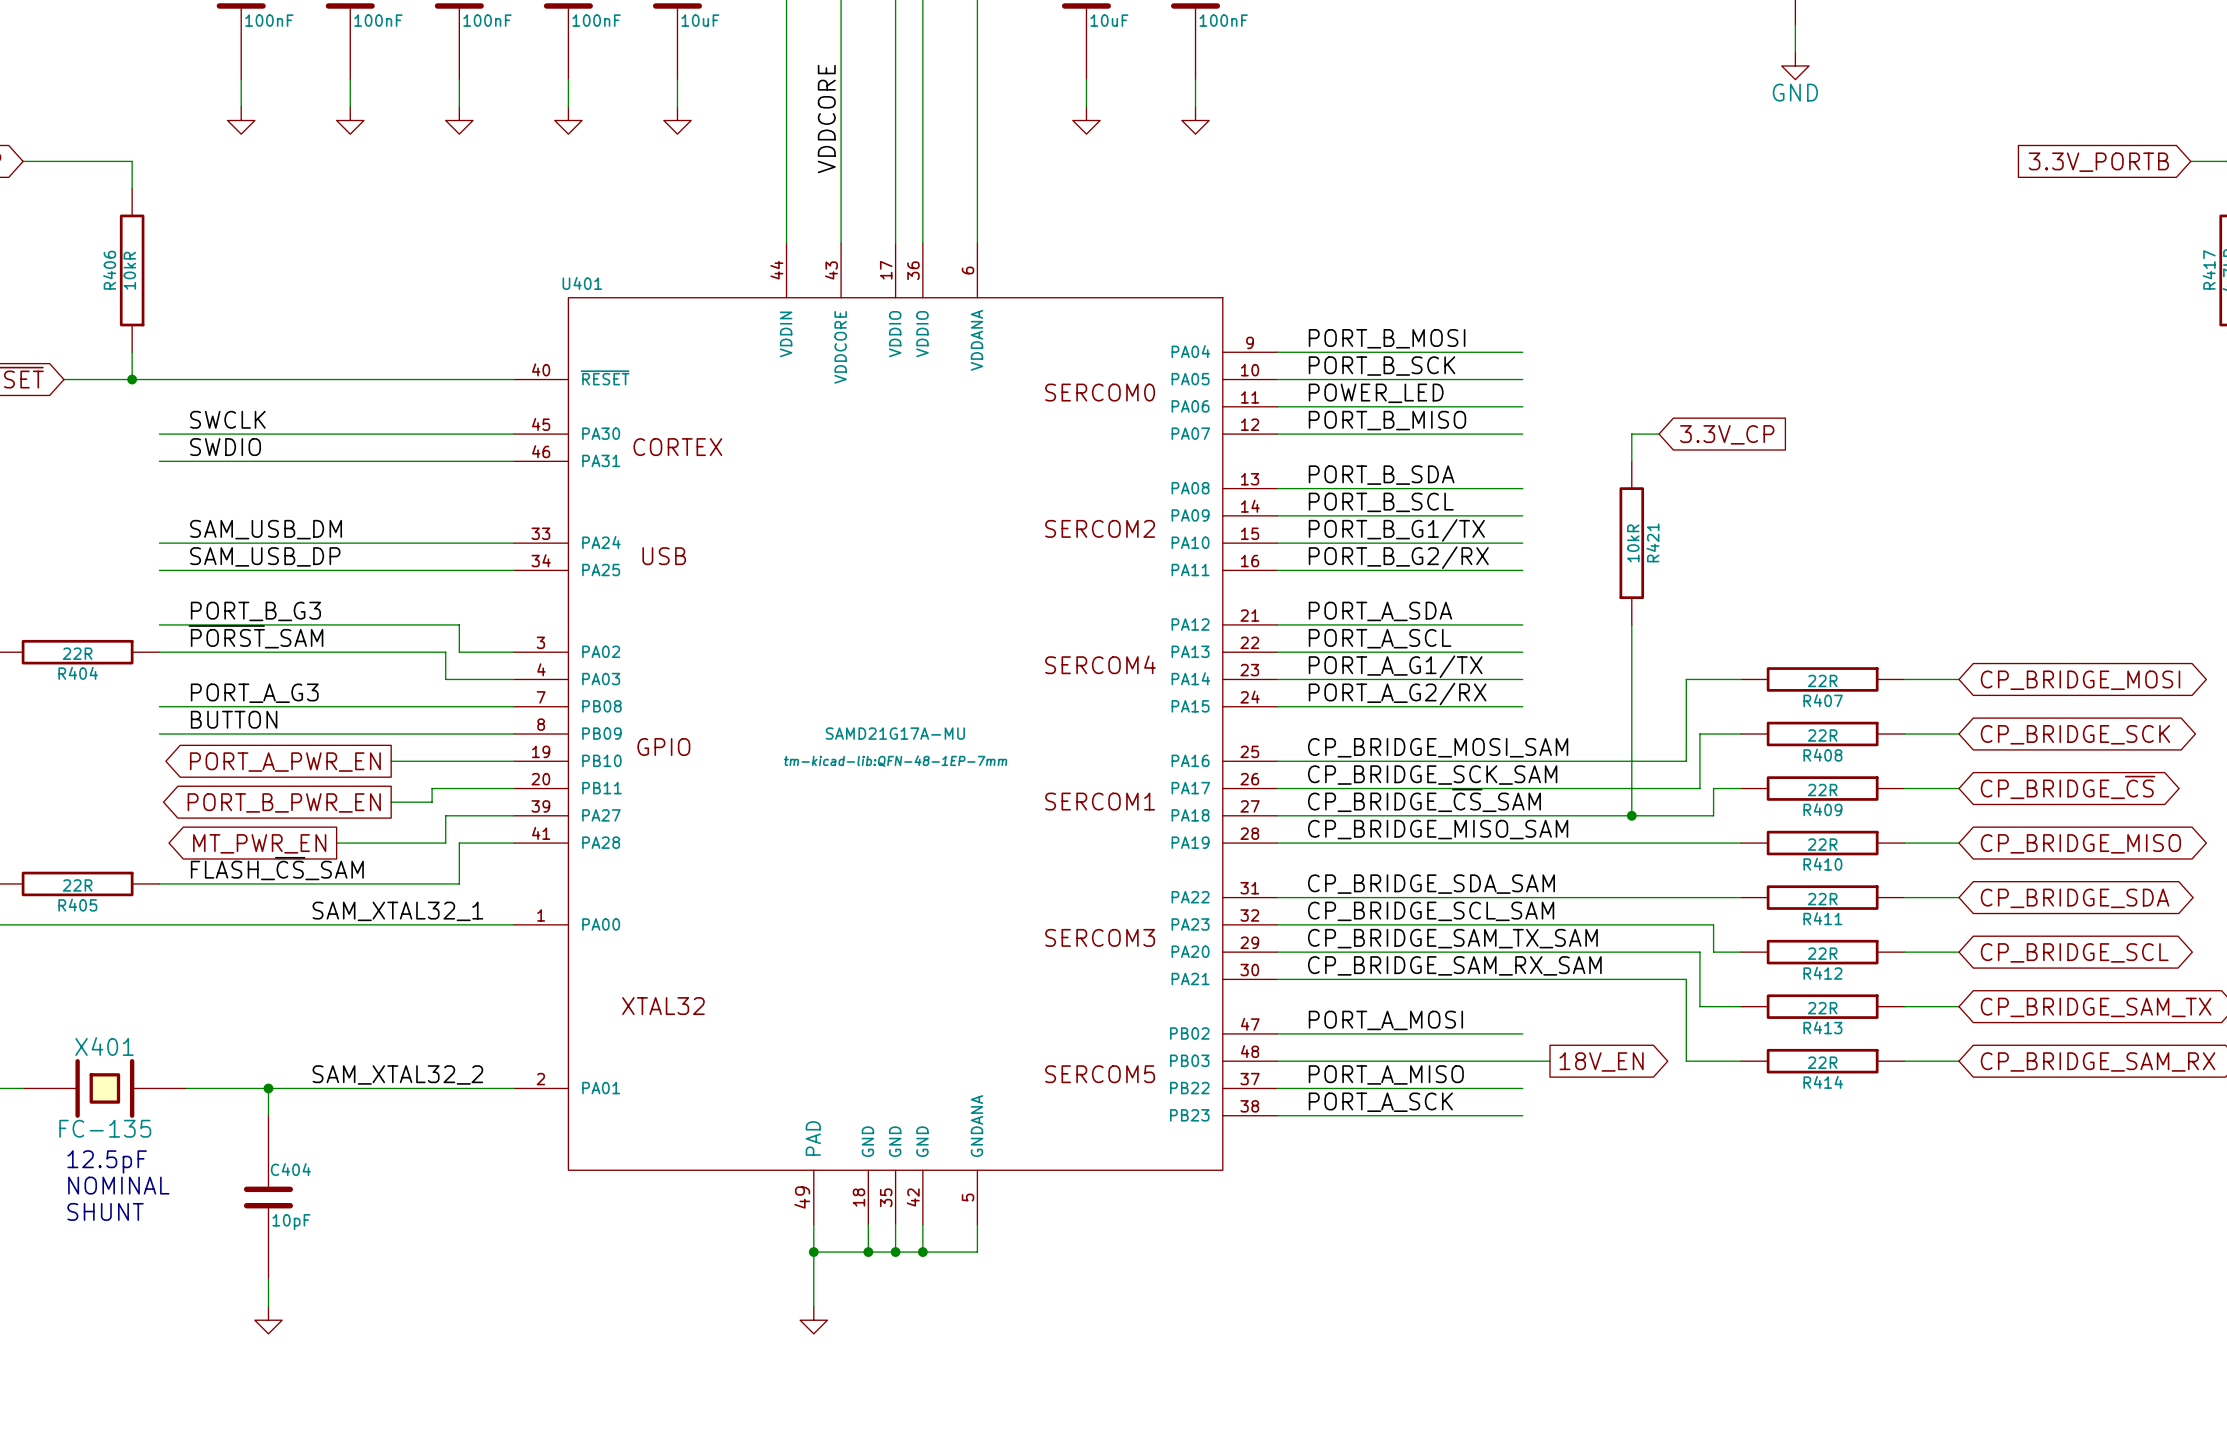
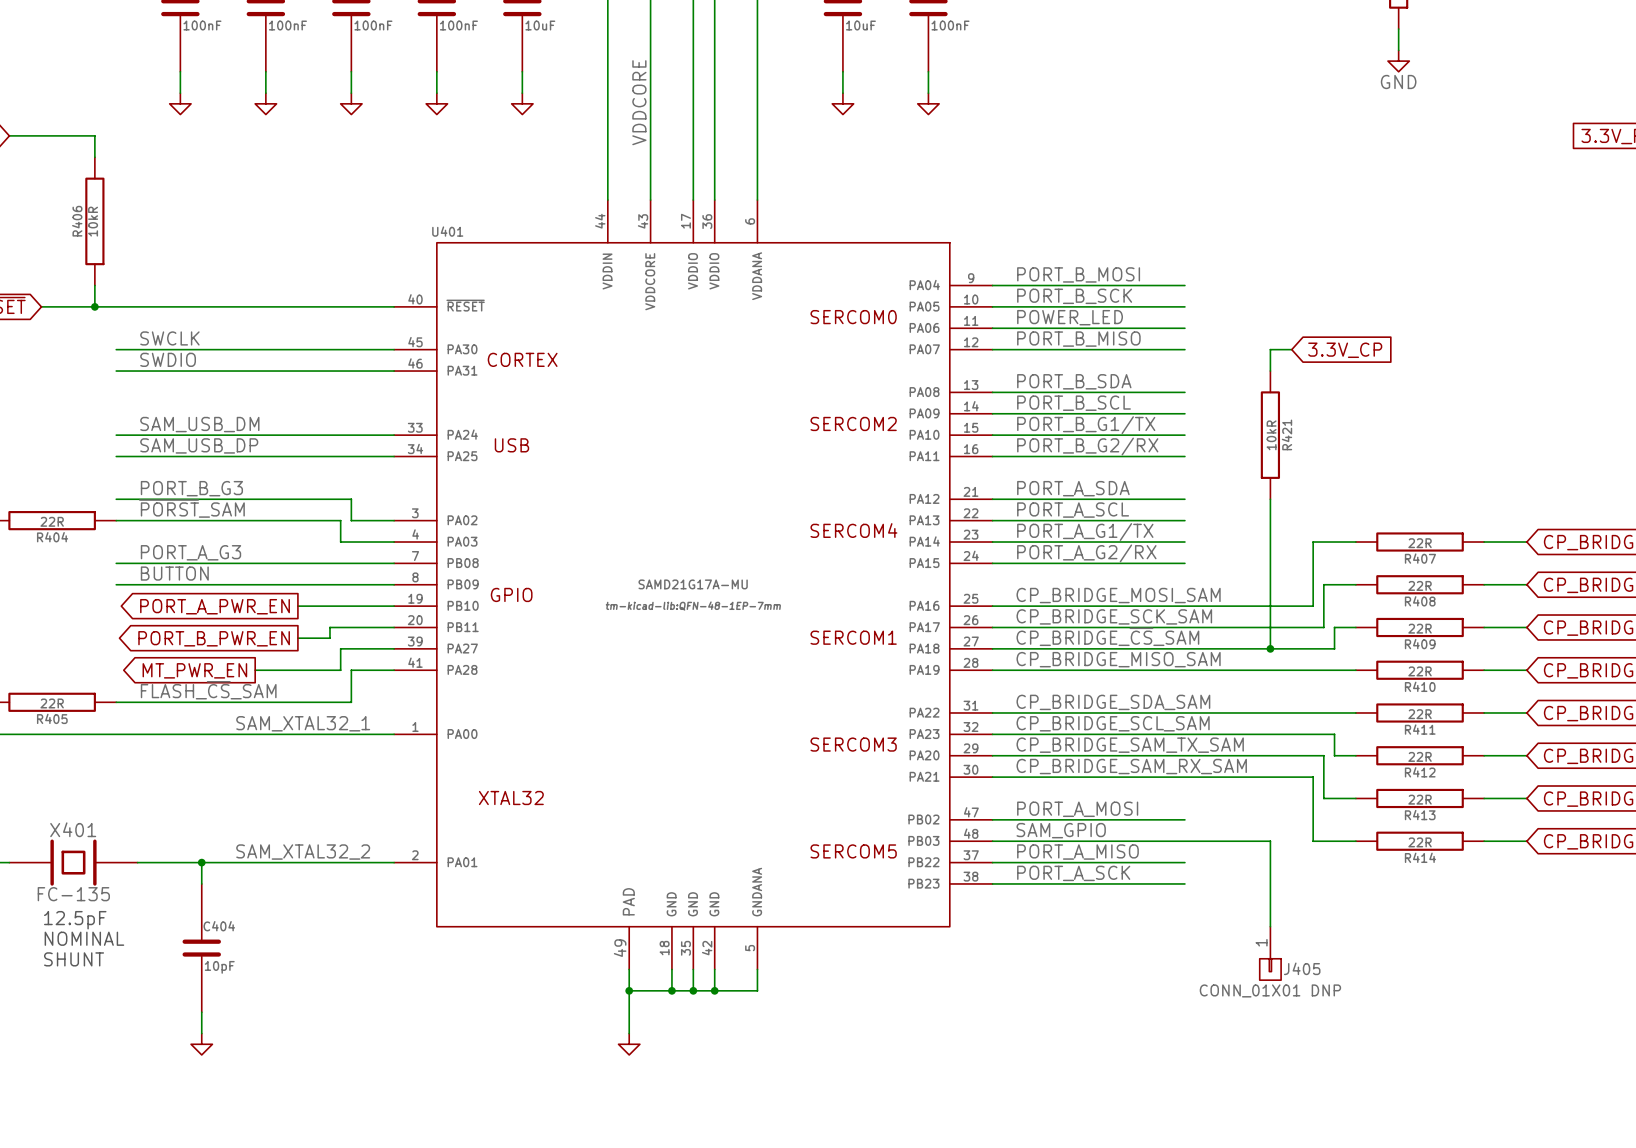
label: none -> SAM_GPIO (1061, 830)
wire: none -> (1206, 841) (1270, 841) (1270, 926)
global label: 18V_EN (1601, 1061) -> none
J405: none -> CONN_01X01 DNP (1270, 953)

